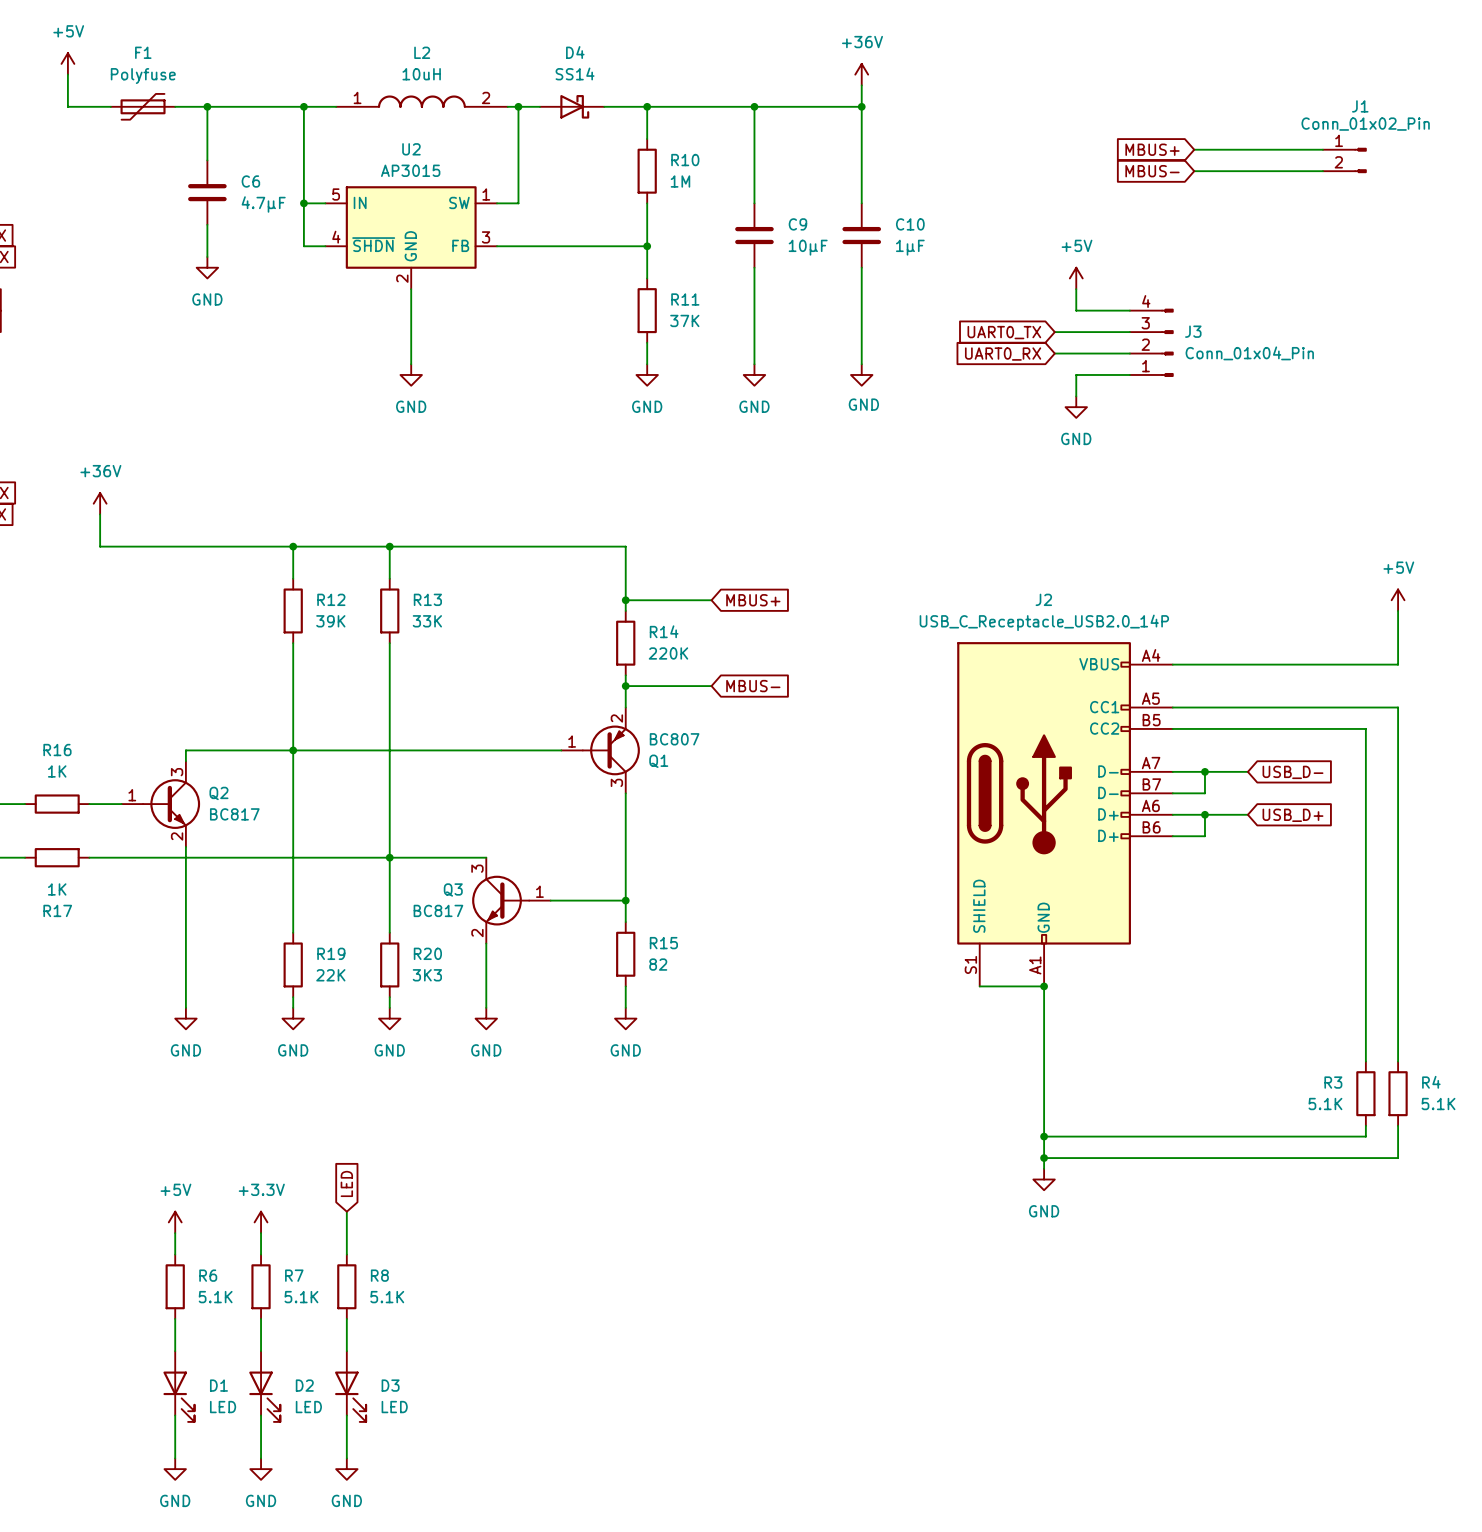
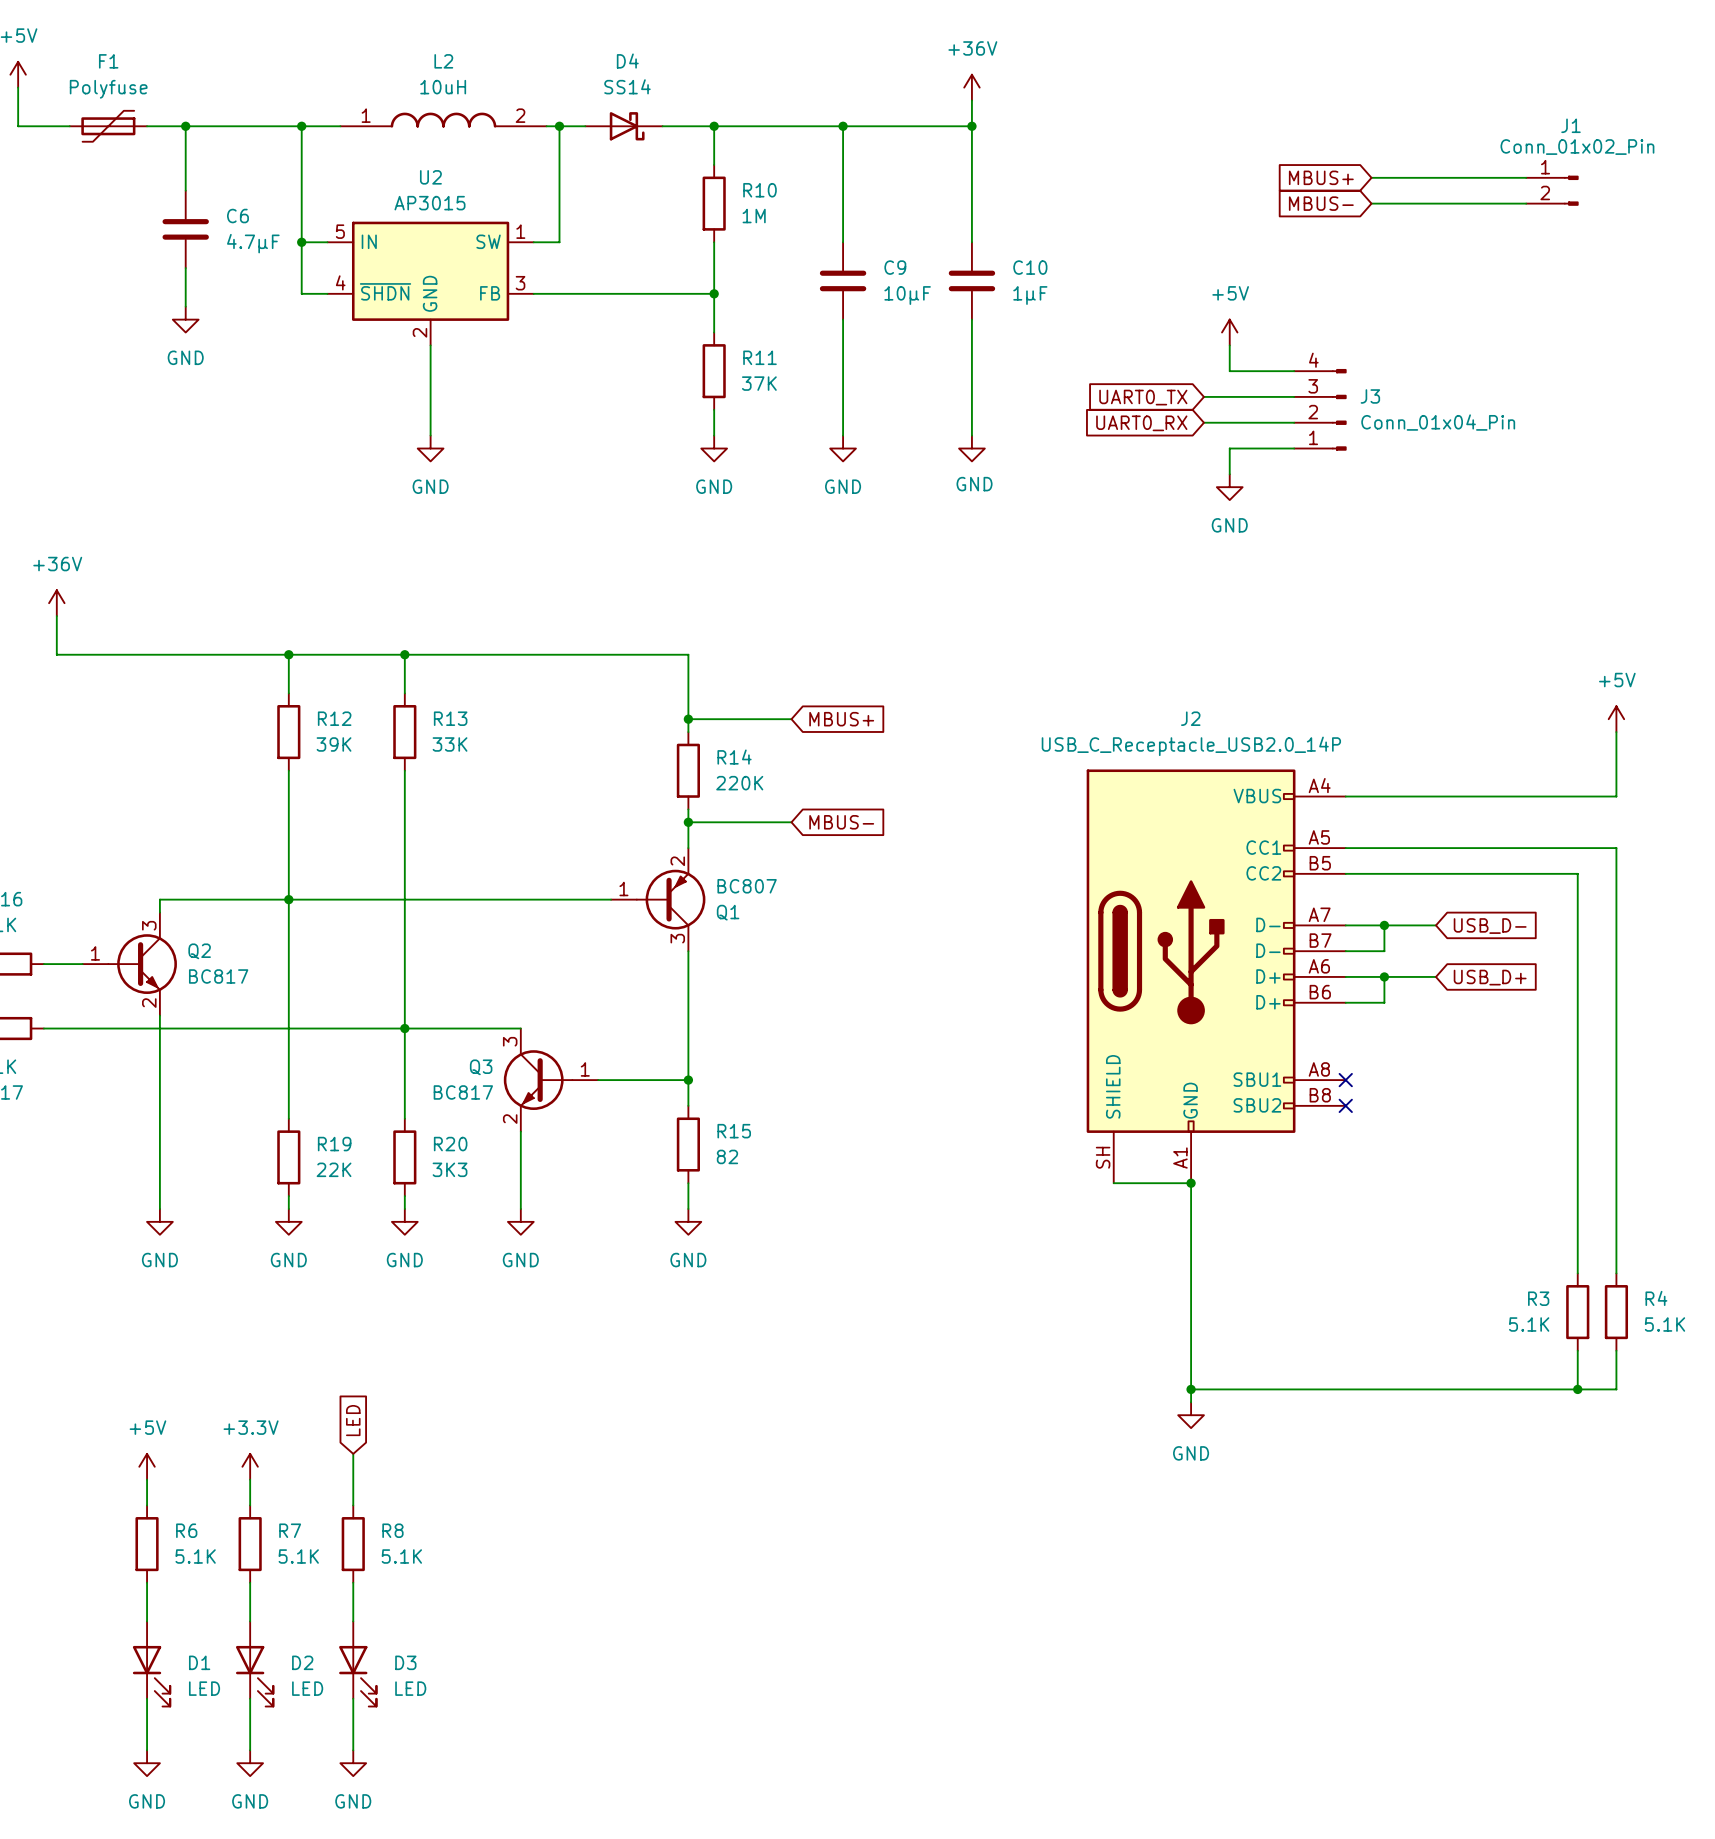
J2 symbol: [957, 642, 1173, 987] -> [1086, 769, 1346, 1184]
no-connect mark: none -> (1345, 1080)
no-connect mark: none -> (1345, 1105)
wire: (1044, 1136) (1365, 1136) -> (1577, 1389) (1577, 1363)
junction: (1044, 1136) -> none
junction: none -> (1577, 1389)

